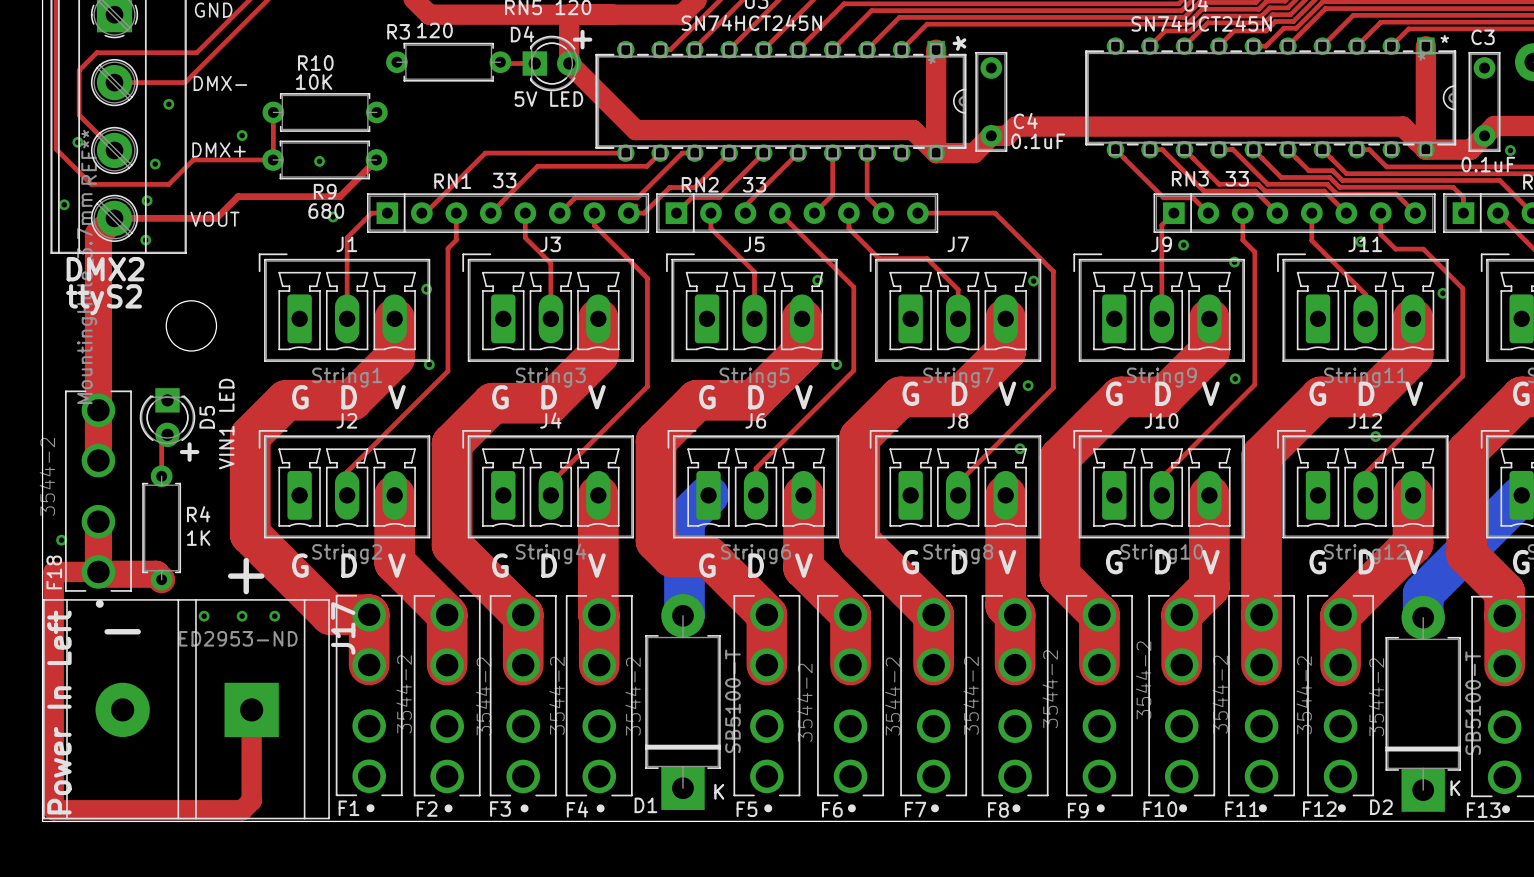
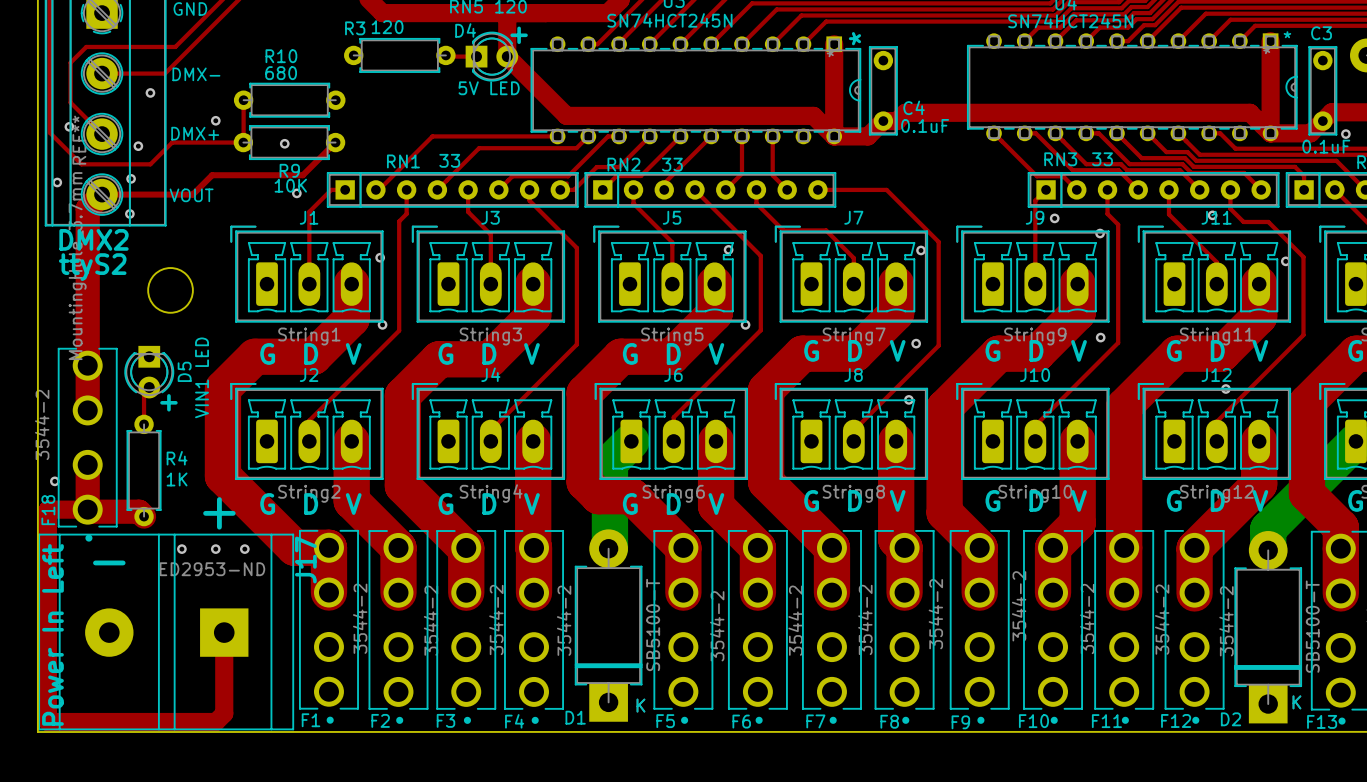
R9 value position: 10K (314, 82) -> 10K (290, 185)
R10 value position: 680 (326, 211) -> 680 (281, 73)

